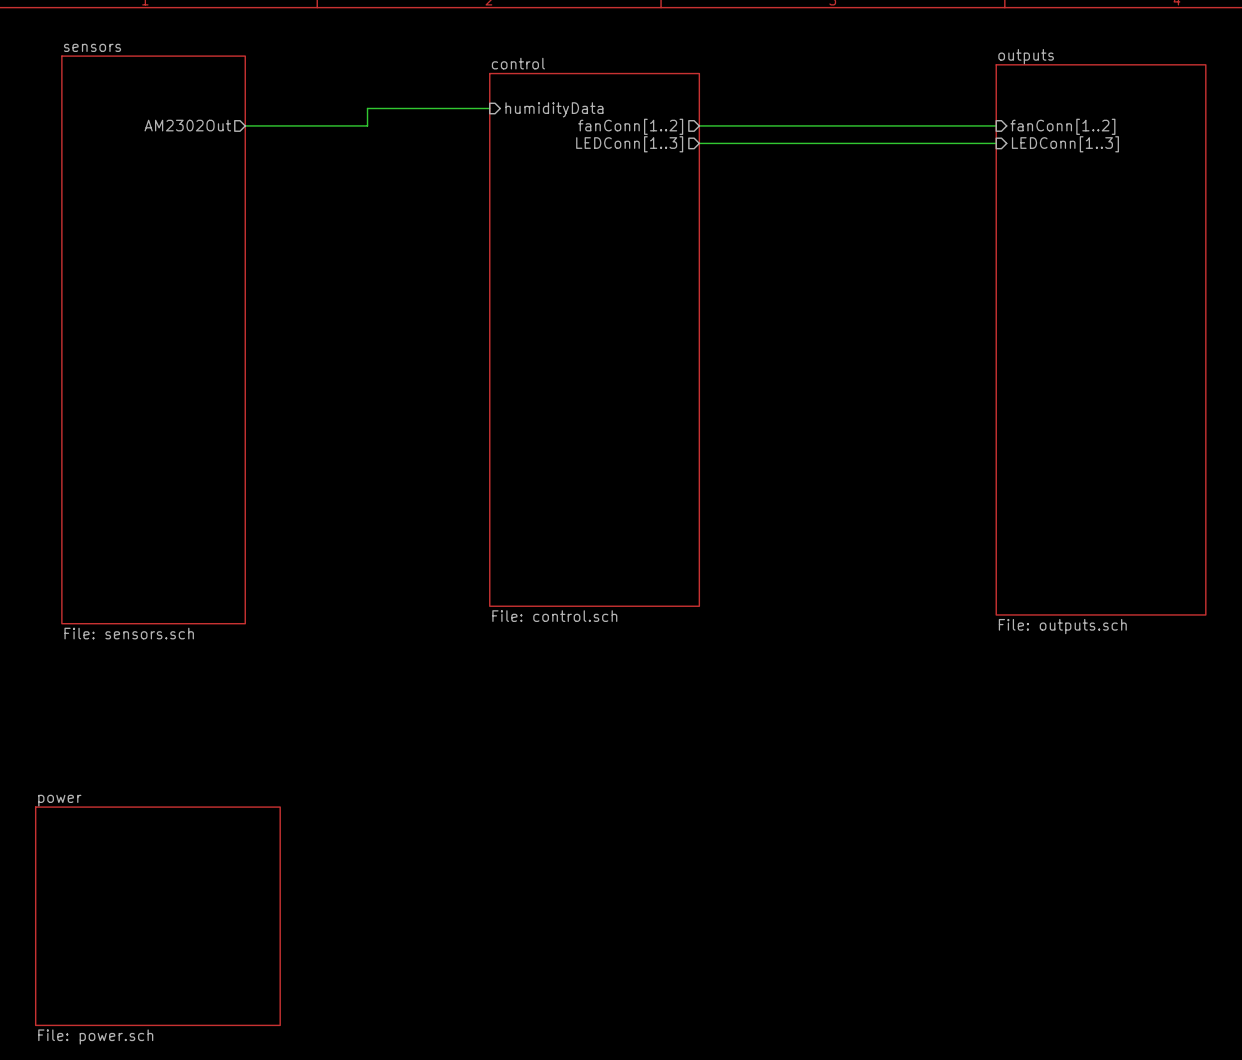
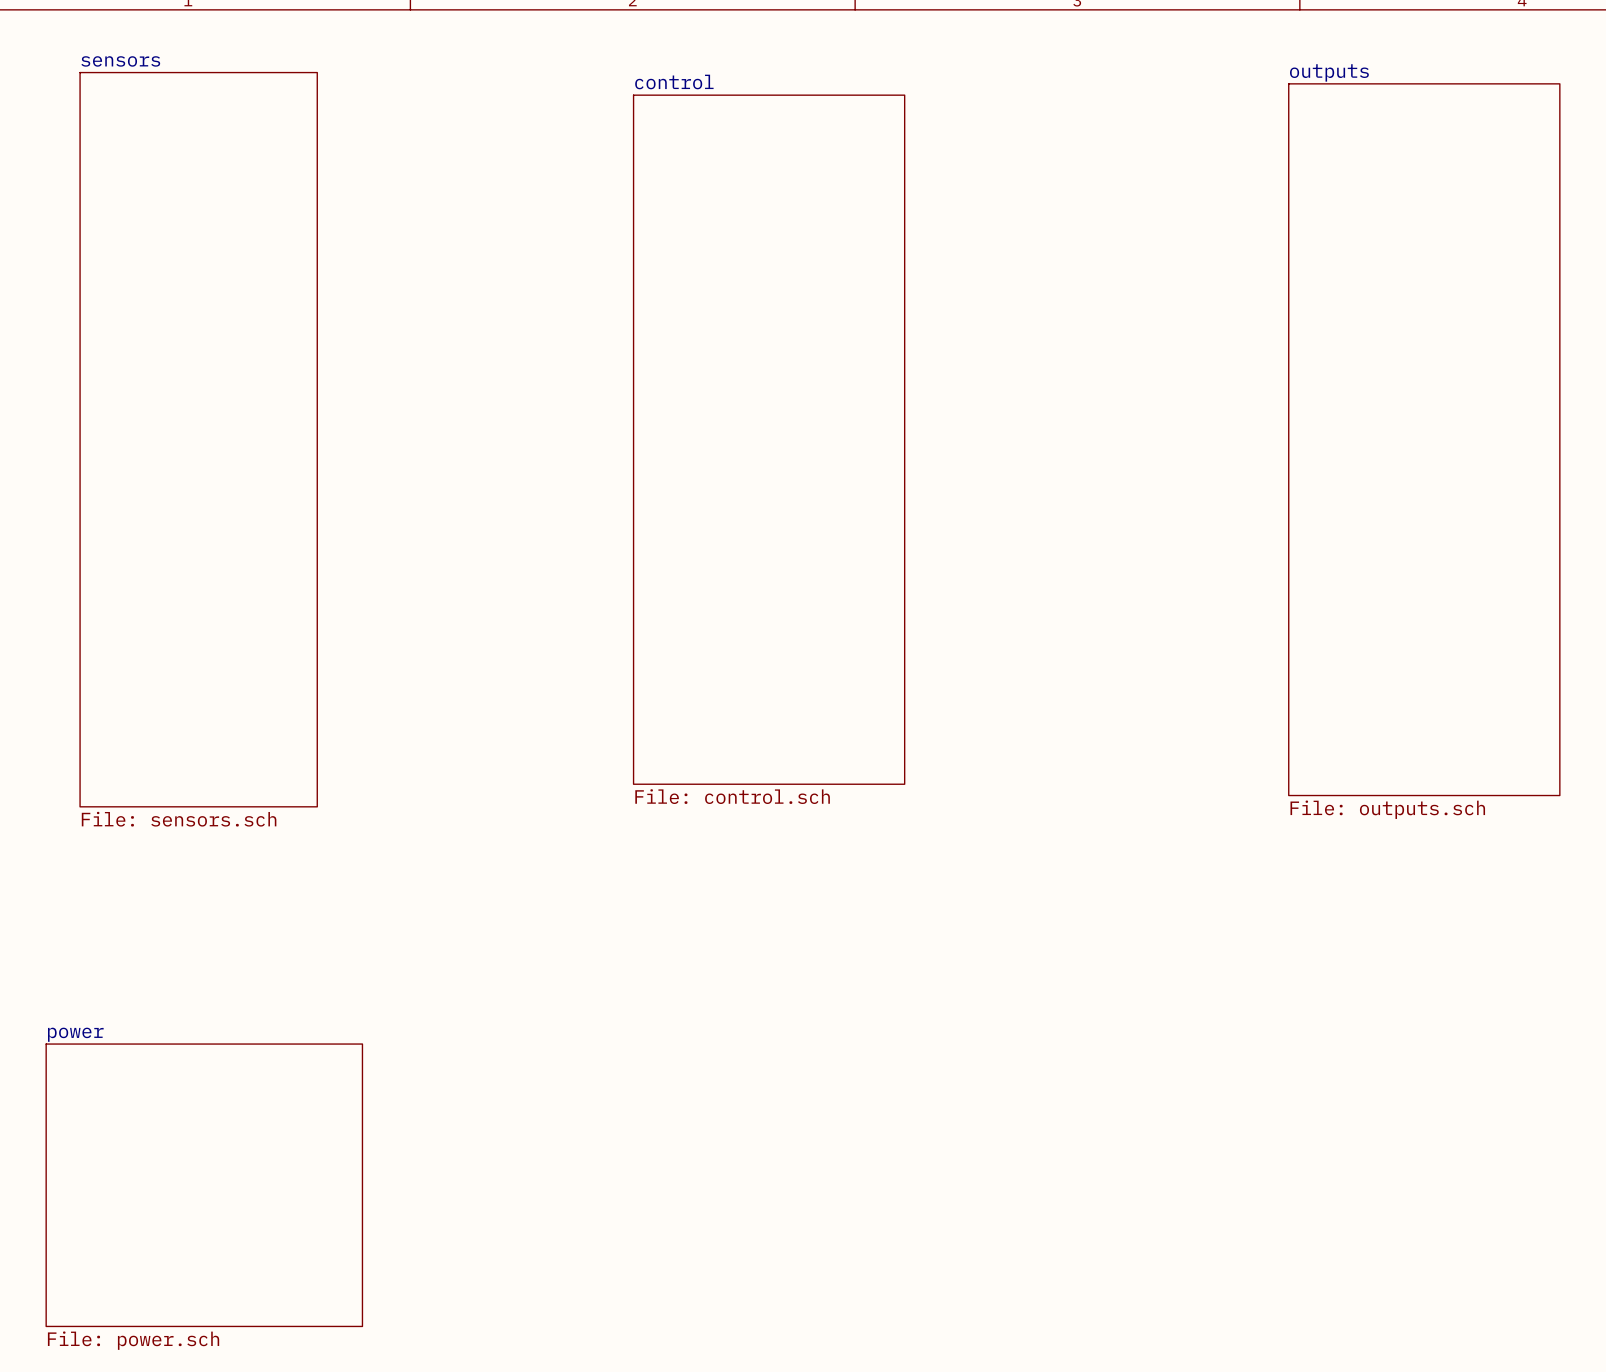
wire: (489, 108) (367, 108) (367, 125) (245, 125) -> none
sheet pin: humidityData (554, 109) -> none
sheet pin: AM2302Out (187, 125) -> none
wire: (699, 125) (996, 125) -> none
sheet pin: fanConn[1..2] (630, 126) -> none
sheet pin: fanConn[1..2] (1062, 126) -> none
wire: (699, 143) (996, 143) -> none
sheet pin: LEDConn[1..3] (629, 144) -> none
sheet pin: LEDConn[1..3] (1065, 144) -> none

